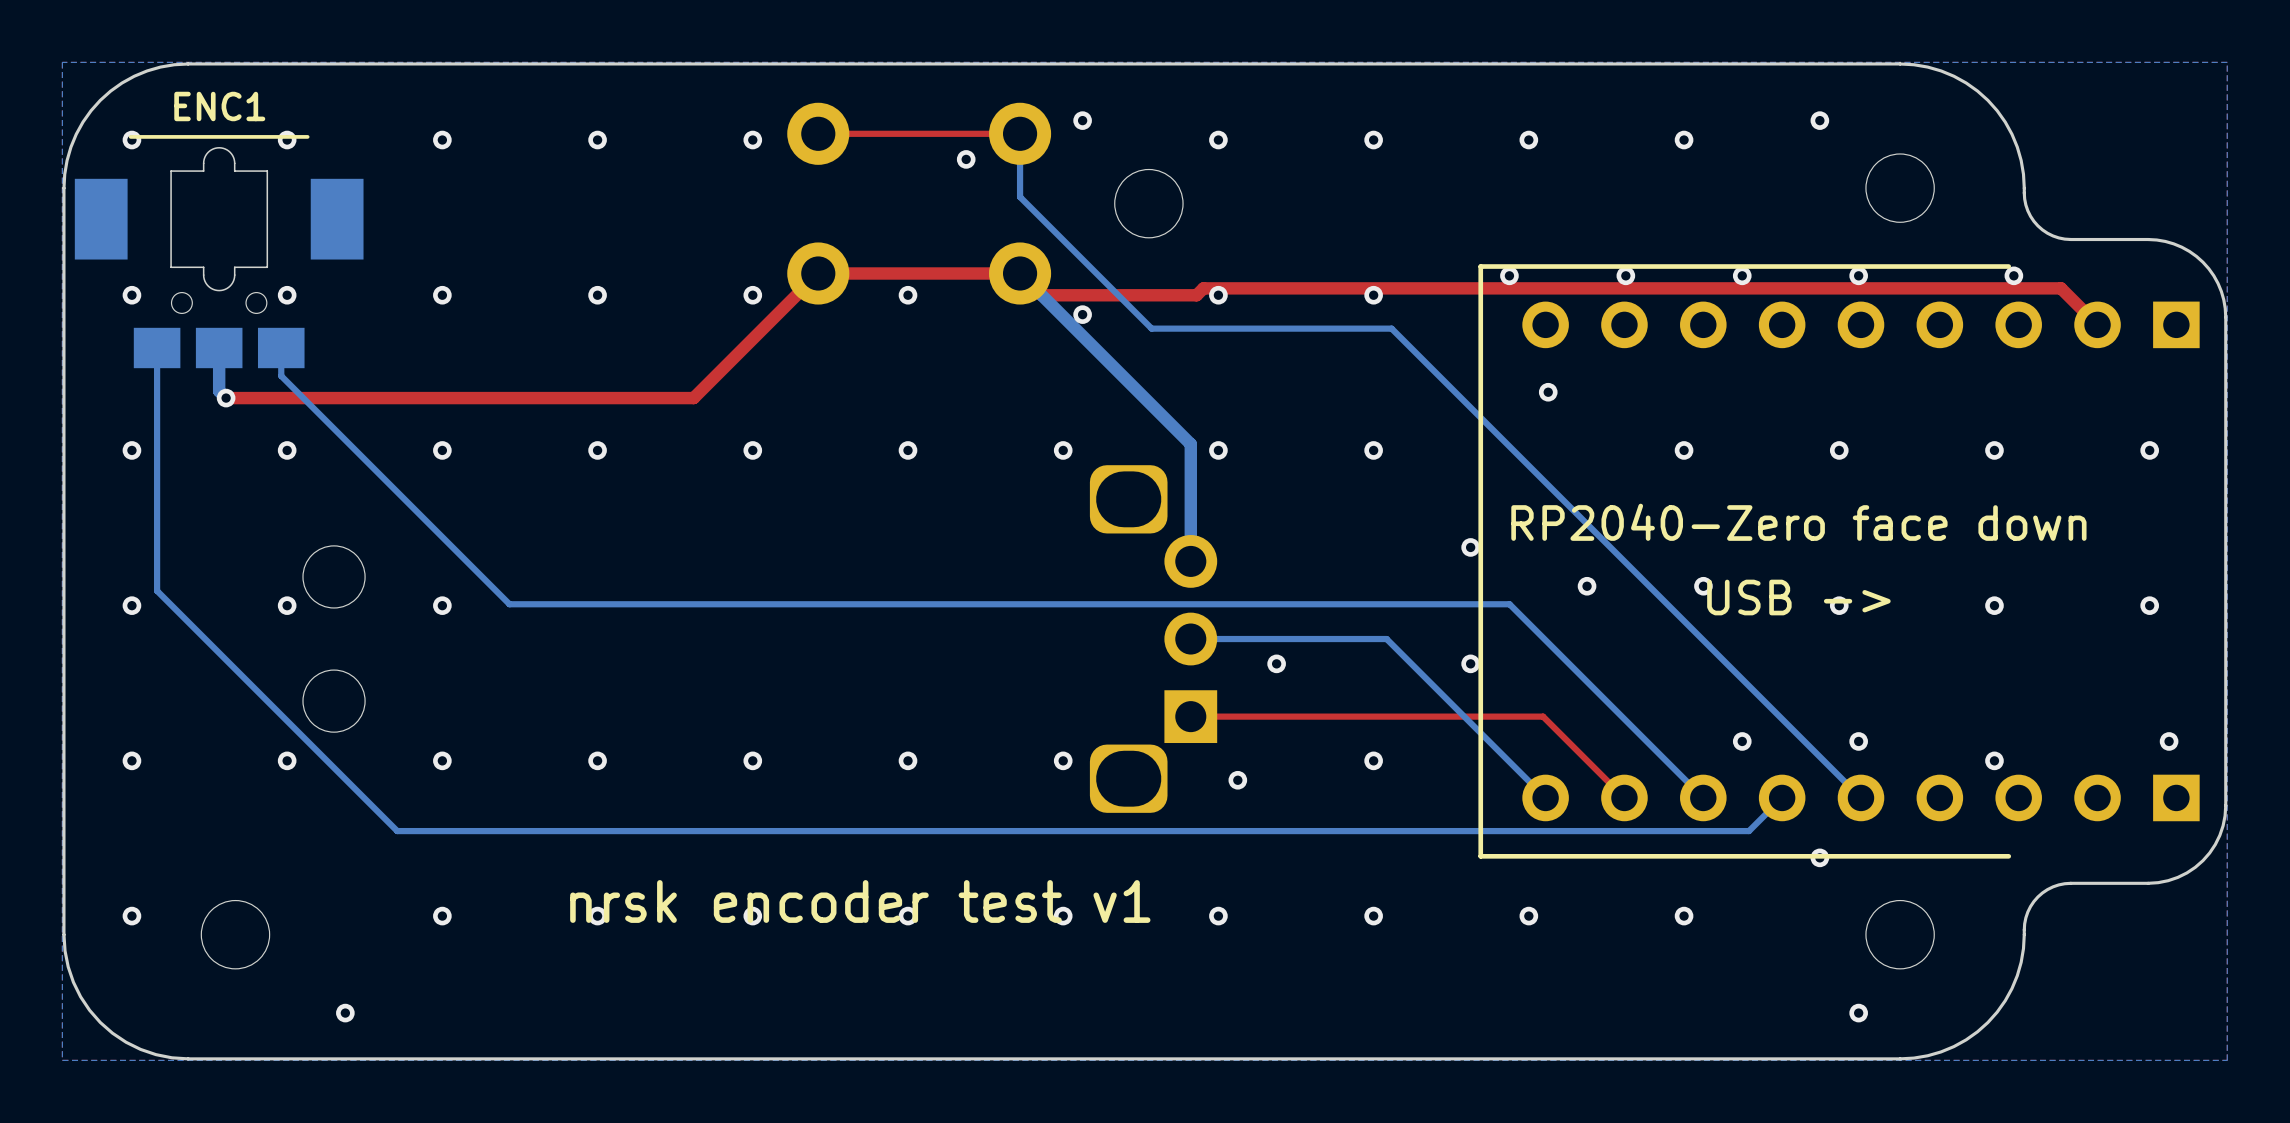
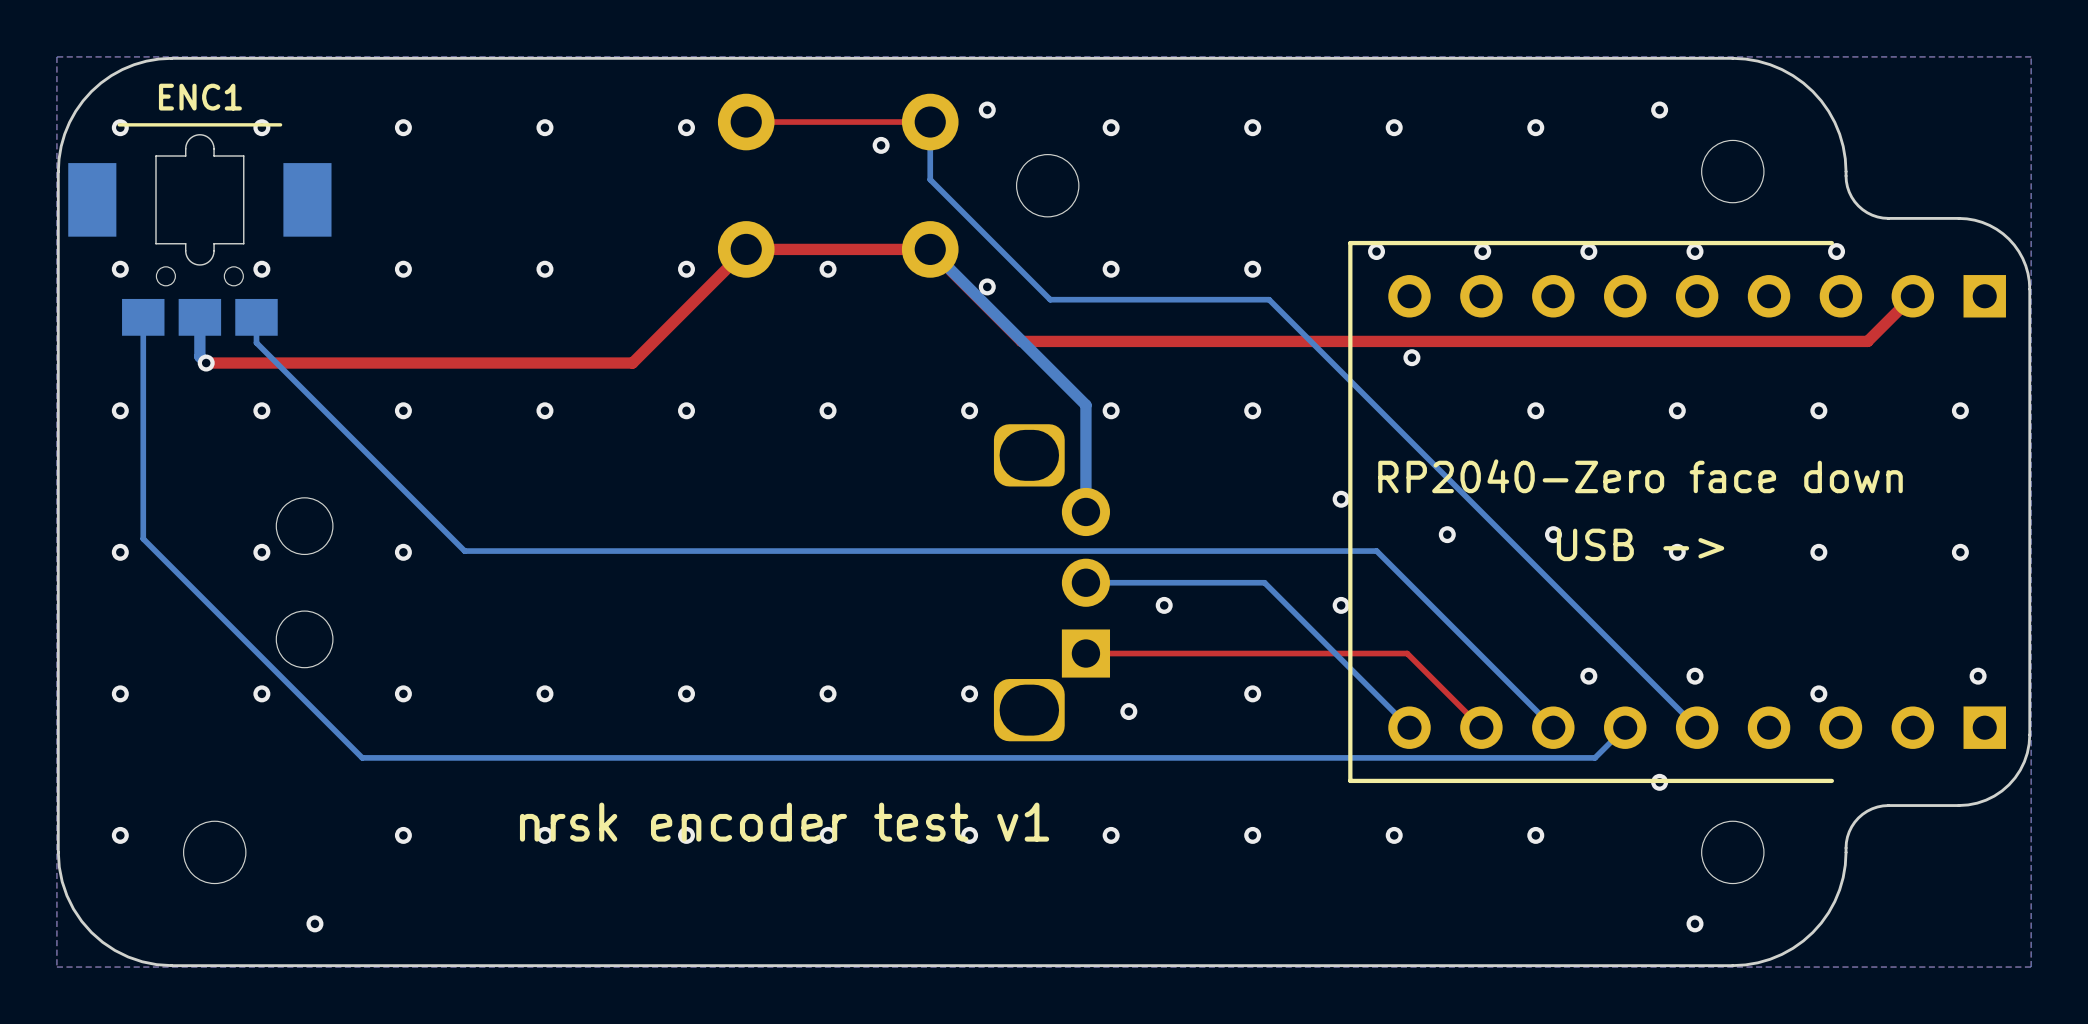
top track: (1041, 295) (1196, 295) (1203, 288) (2061, 288) (2097, 324) -> (950, 270) (1021, 341) (1867, 341) (1912, 296)

